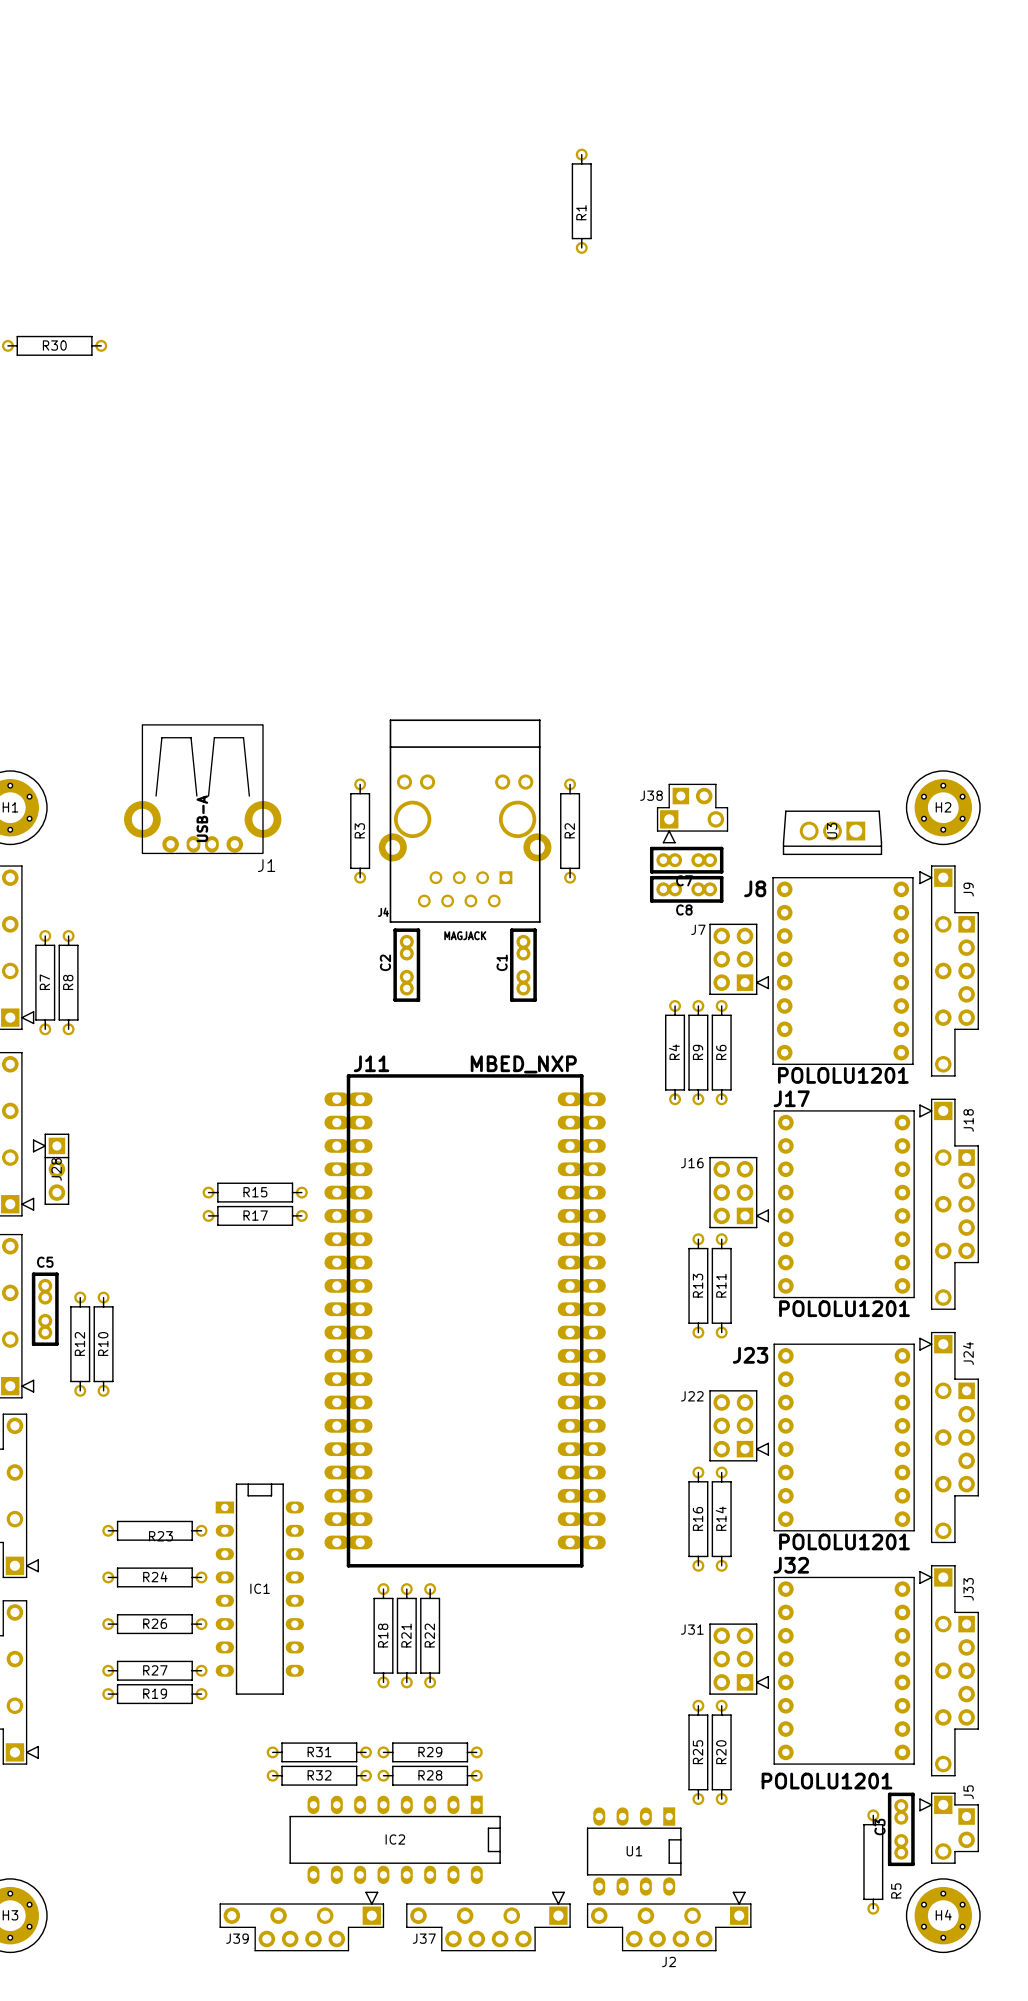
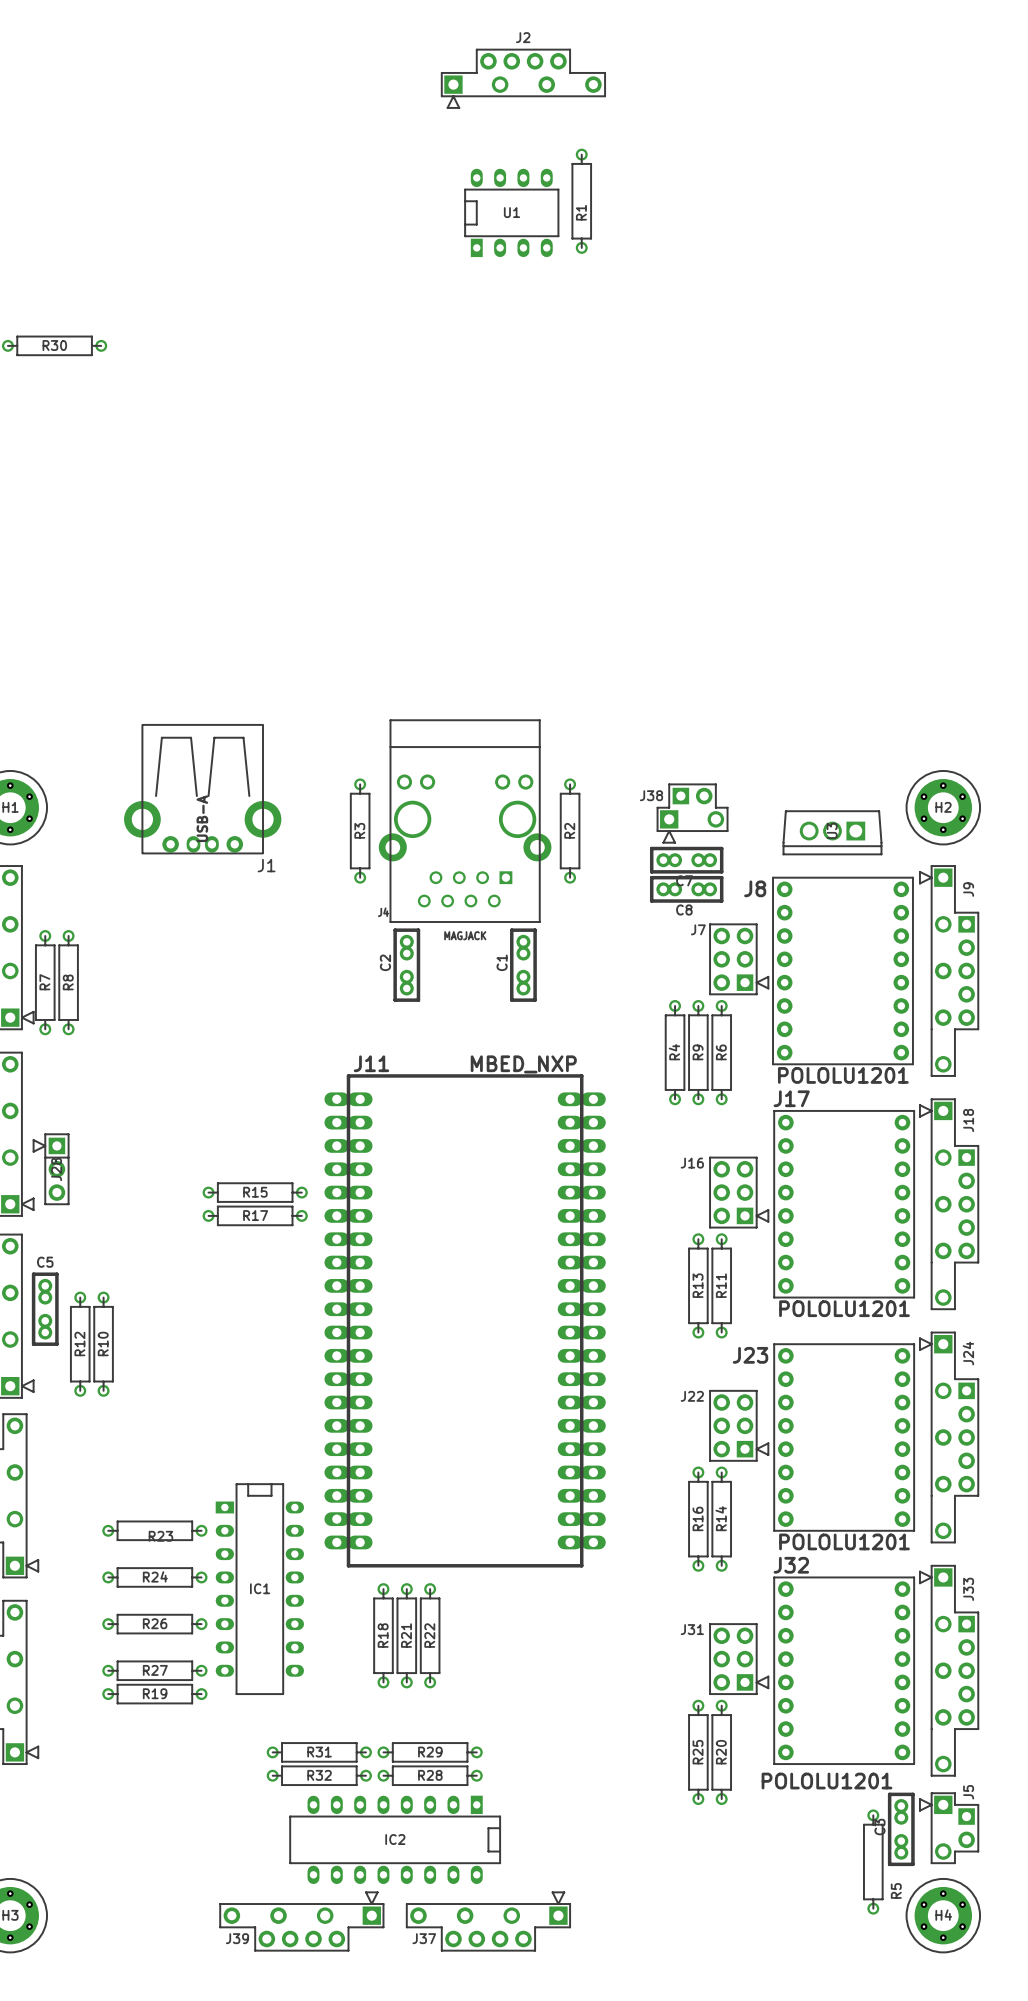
U1 rotation: 0° (634, 1851) -> 180° (511, 212)
U1 position: (634, 1851) -> (511, 212)
J2 rotation: 0° (669, 1921) -> 180° (523, 78)
J2 position: (669, 1921) -> (523, 78)

